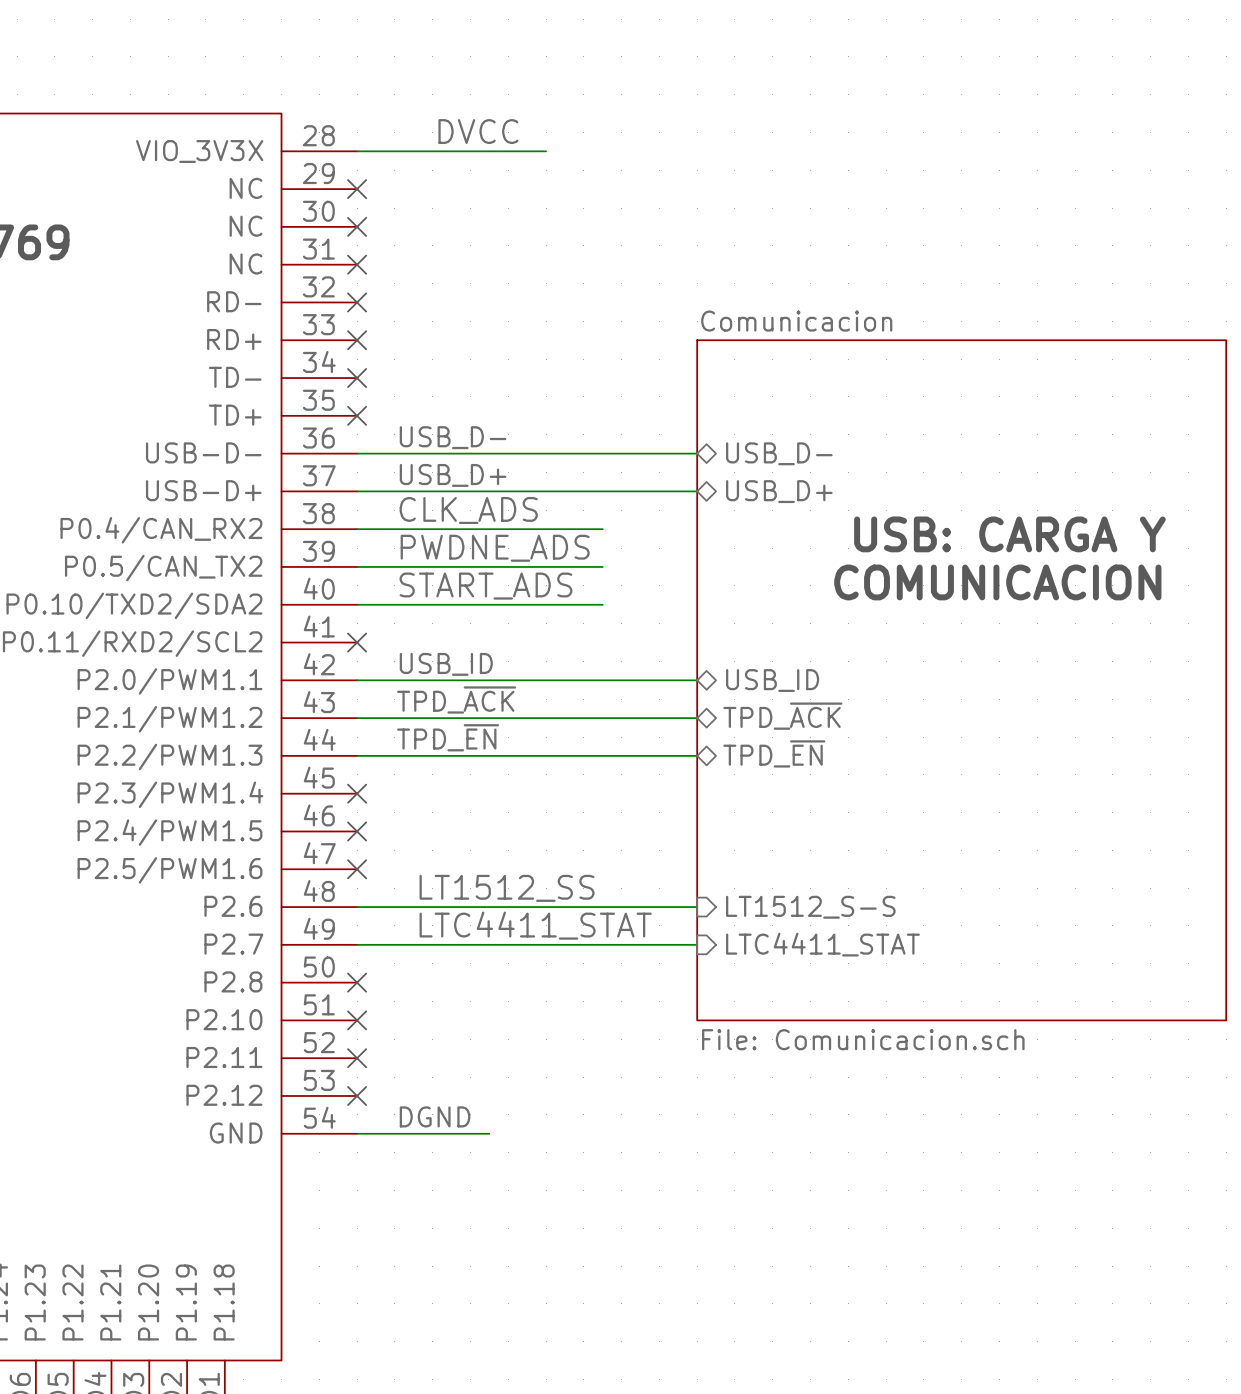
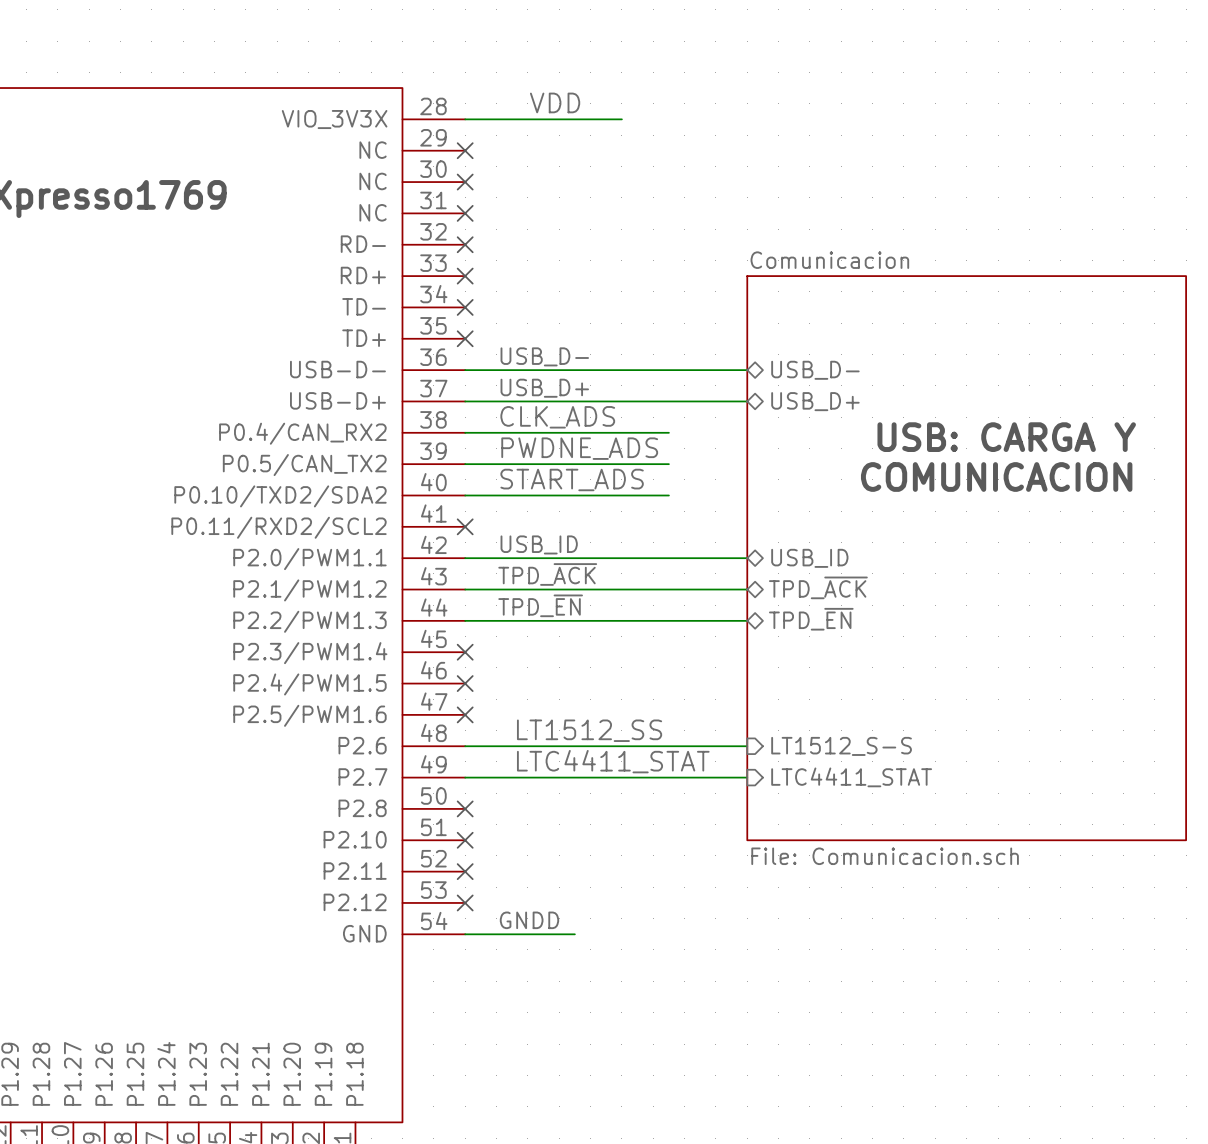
label: DVCC (478, 131) -> VDD (555, 102)
label: DGND (435, 1116) -> GNDD (529, 920)

